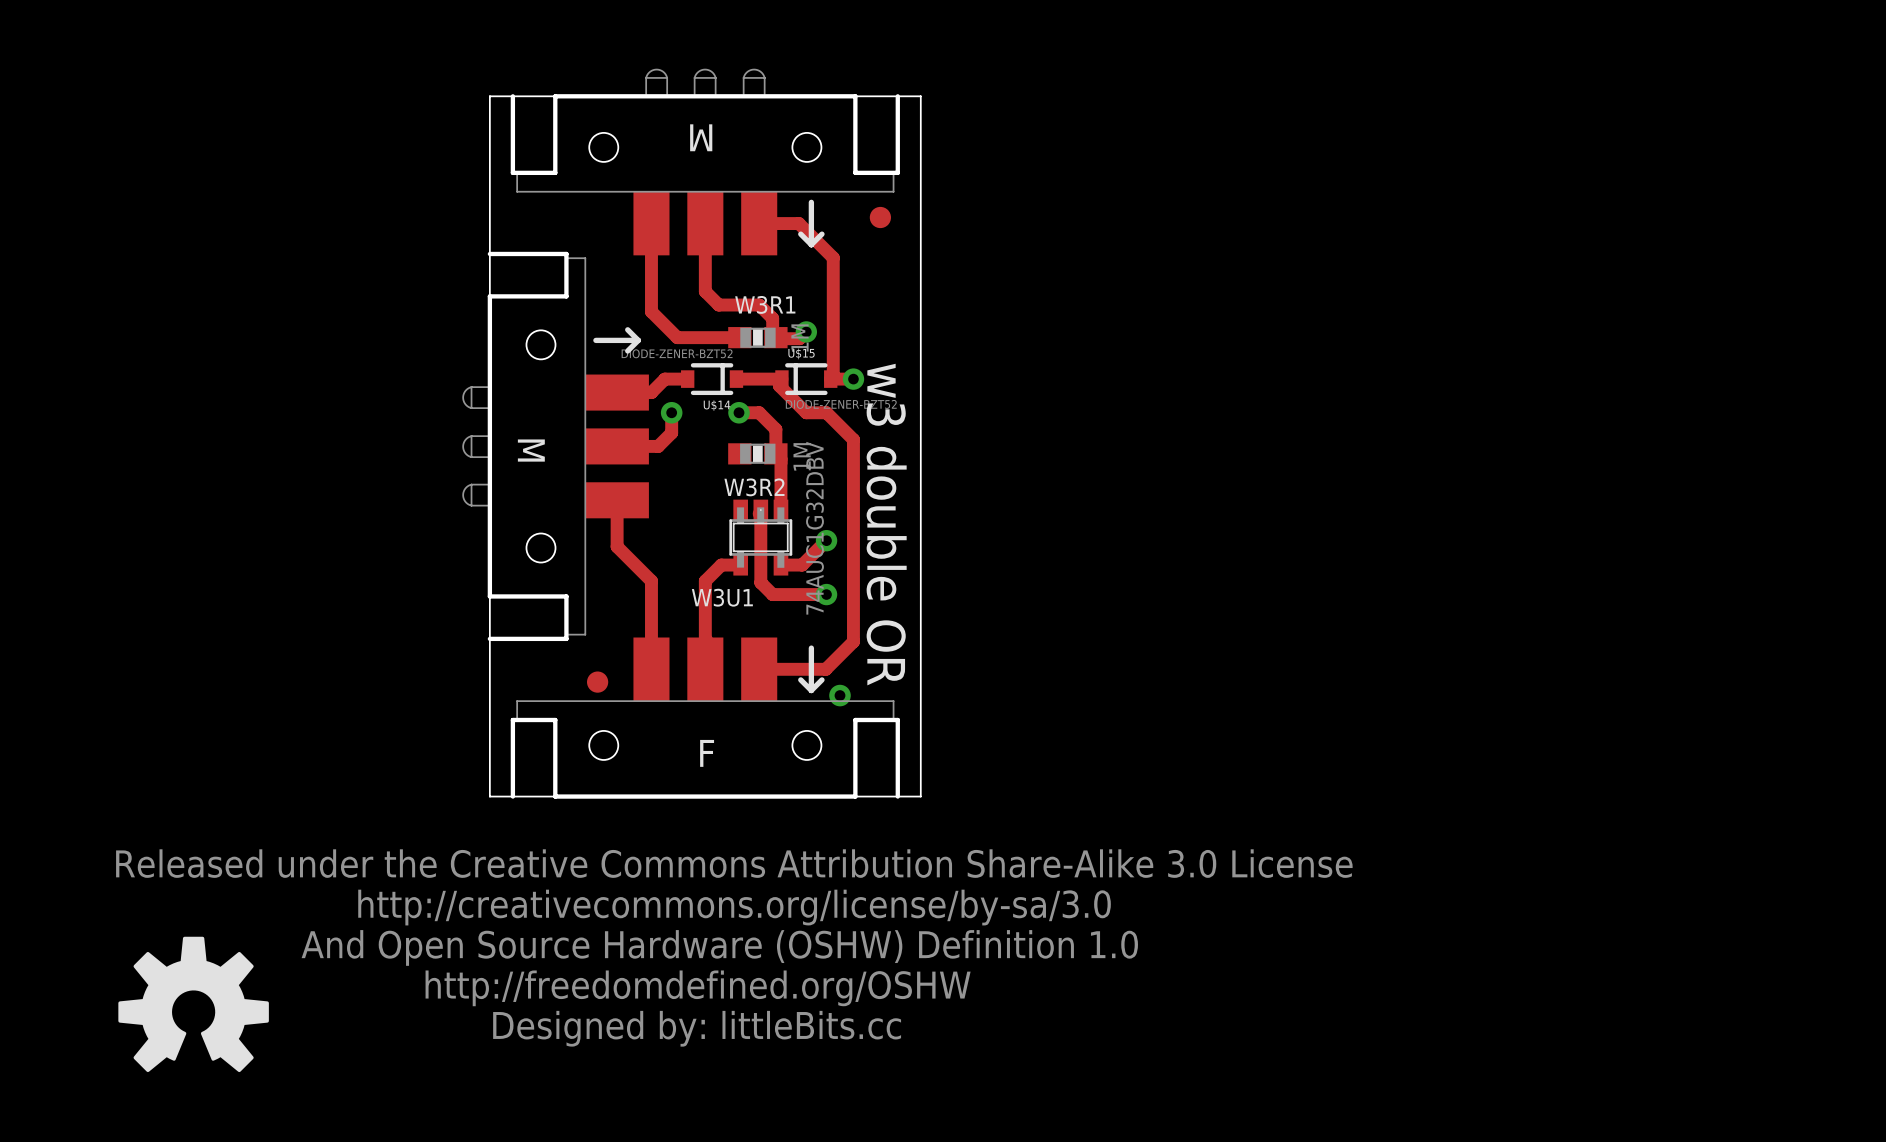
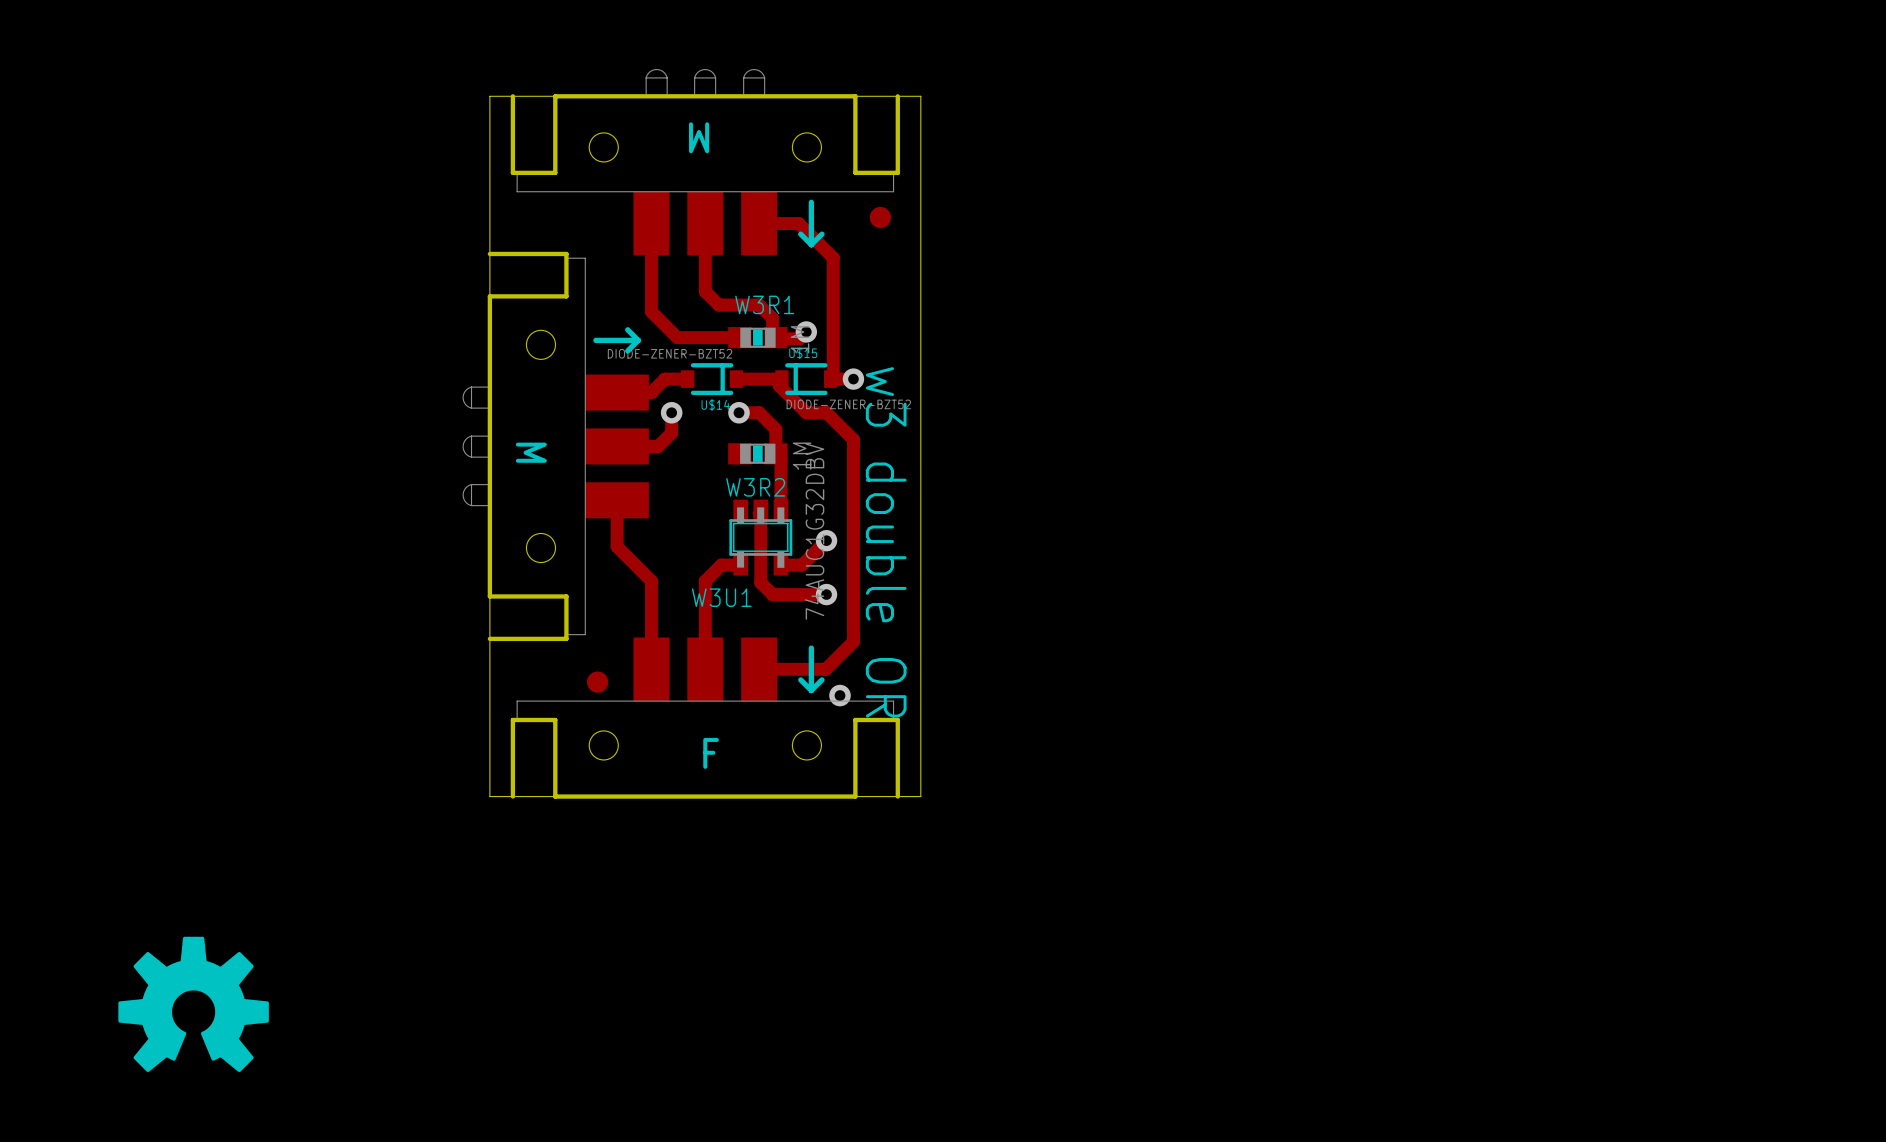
drawing: [116, 849, 1353, 1047] -> none

